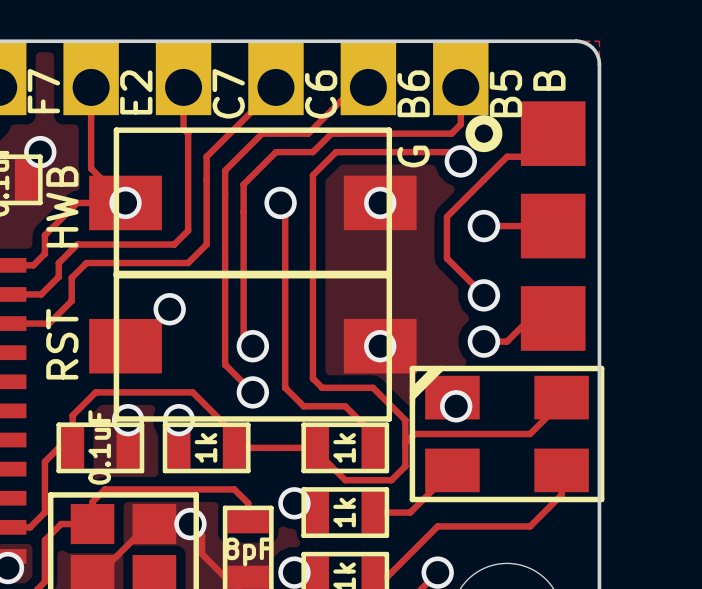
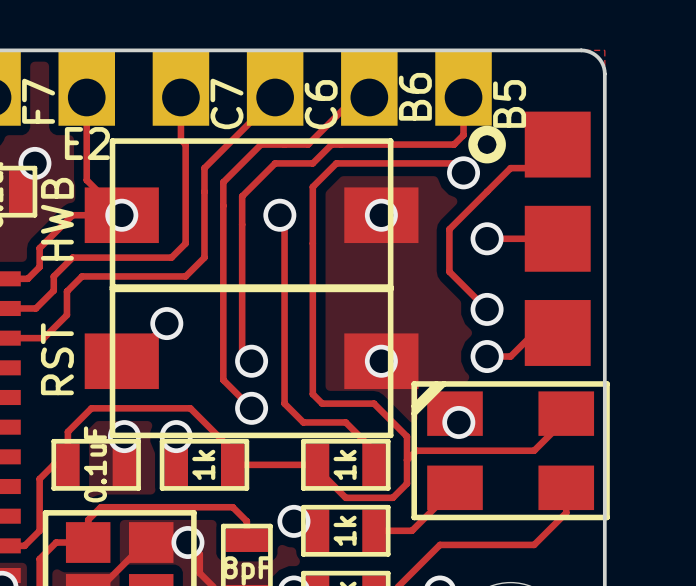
text: B (549, 80) -> none
text rotation: 0° (136, 92) -> 90° clockwise (87, 143)
text: G B6 (413, 118) -> B6 (415, 96)

